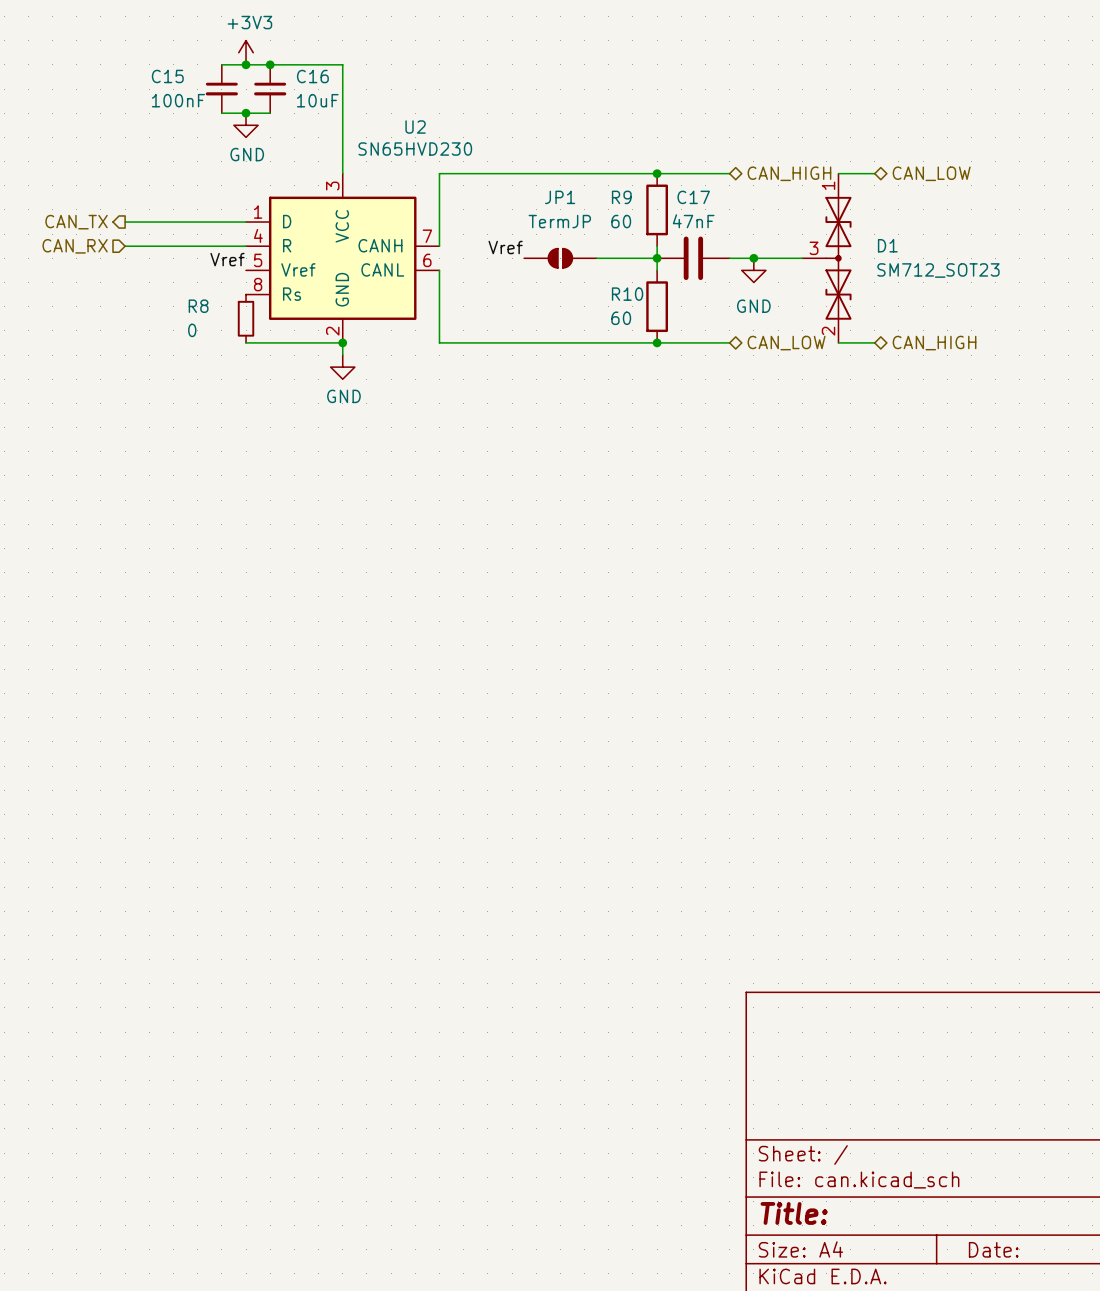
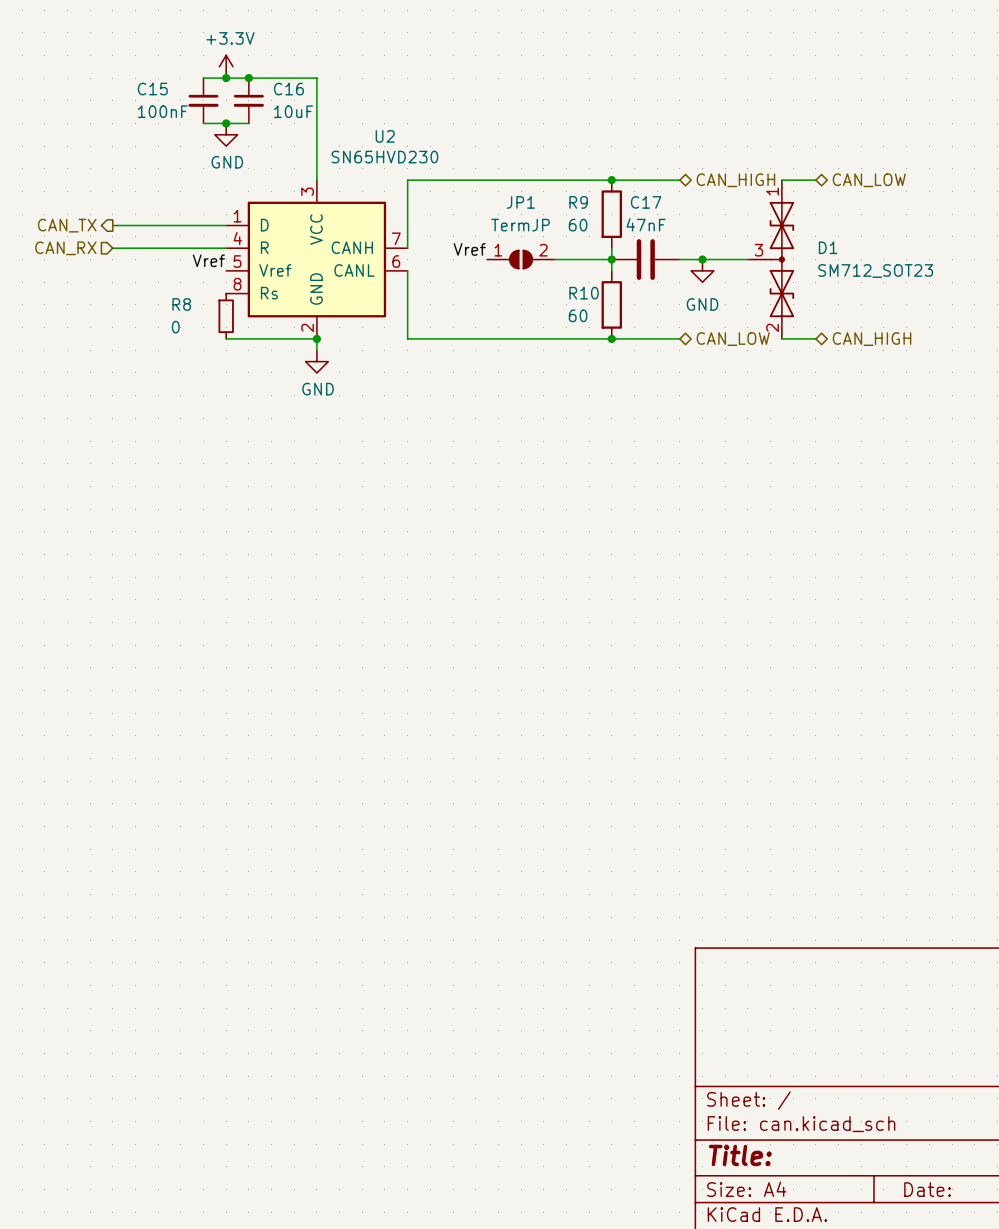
power symbol: +3V3 (246, 52) -> +3.3V (226, 66)
JP1 pin number: none -> 1 (498, 250)
JP1 pin number: none -> 2 (543, 250)

